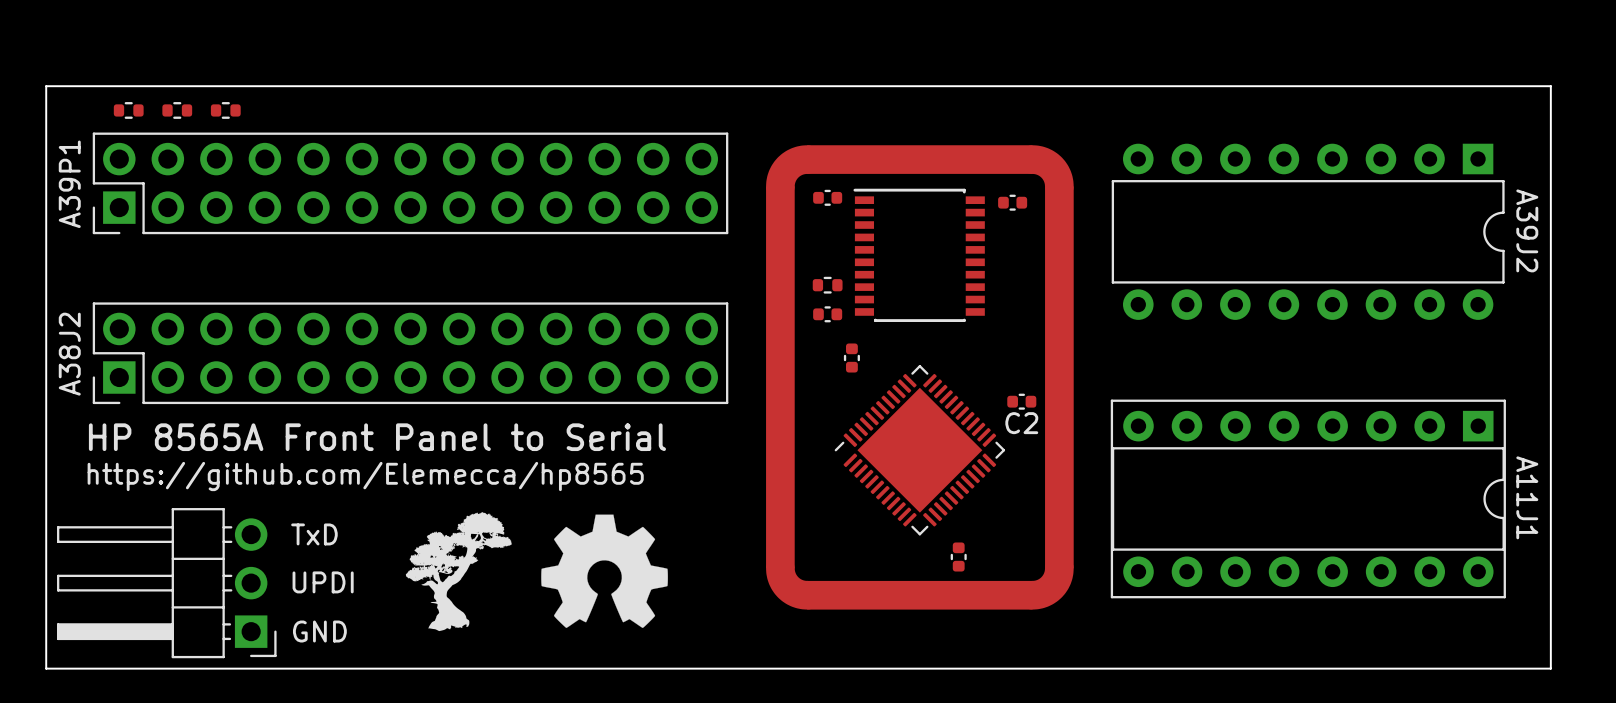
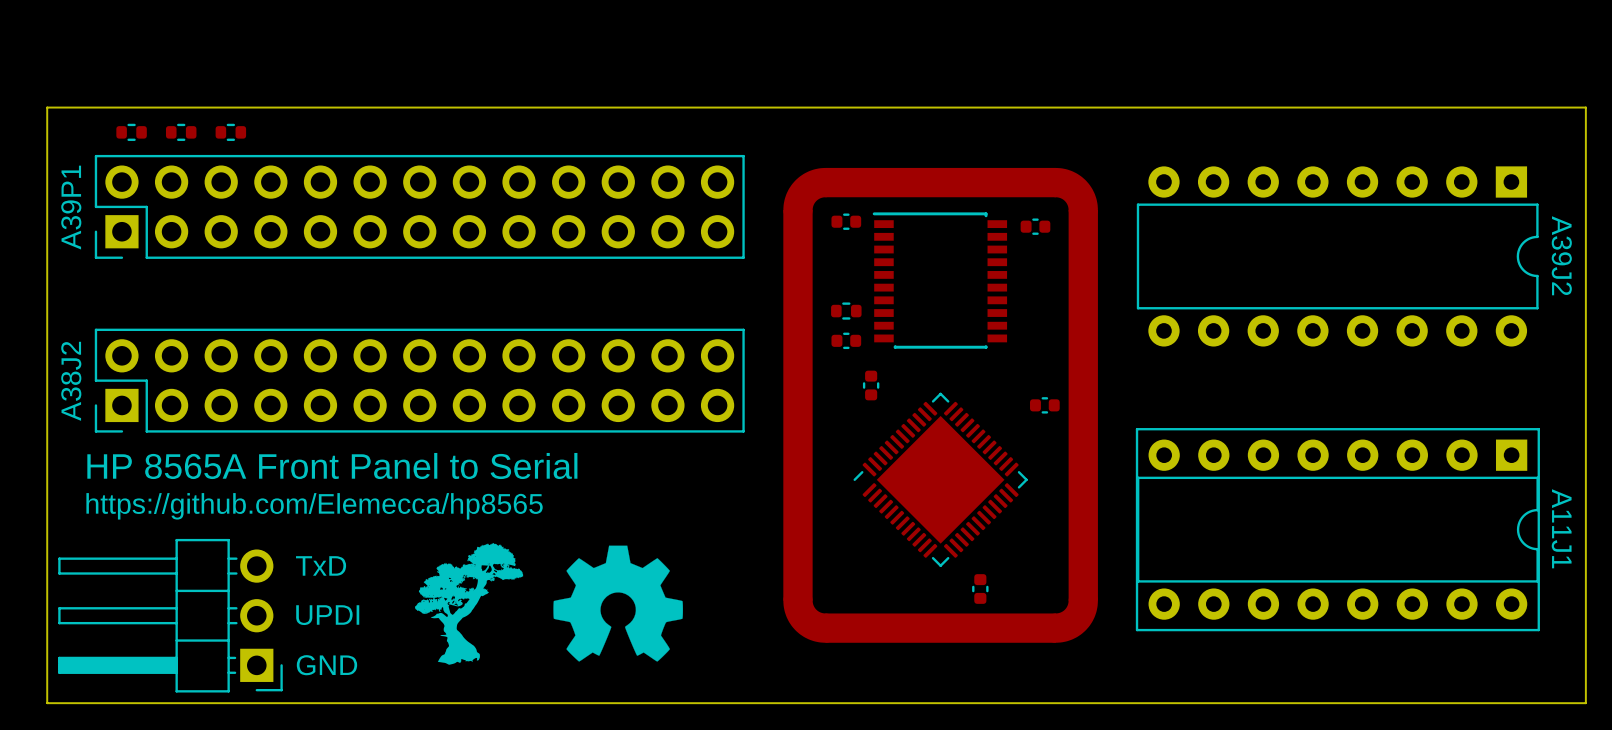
part: none -> (1044, 405)
C2: (1021, 401) -> none

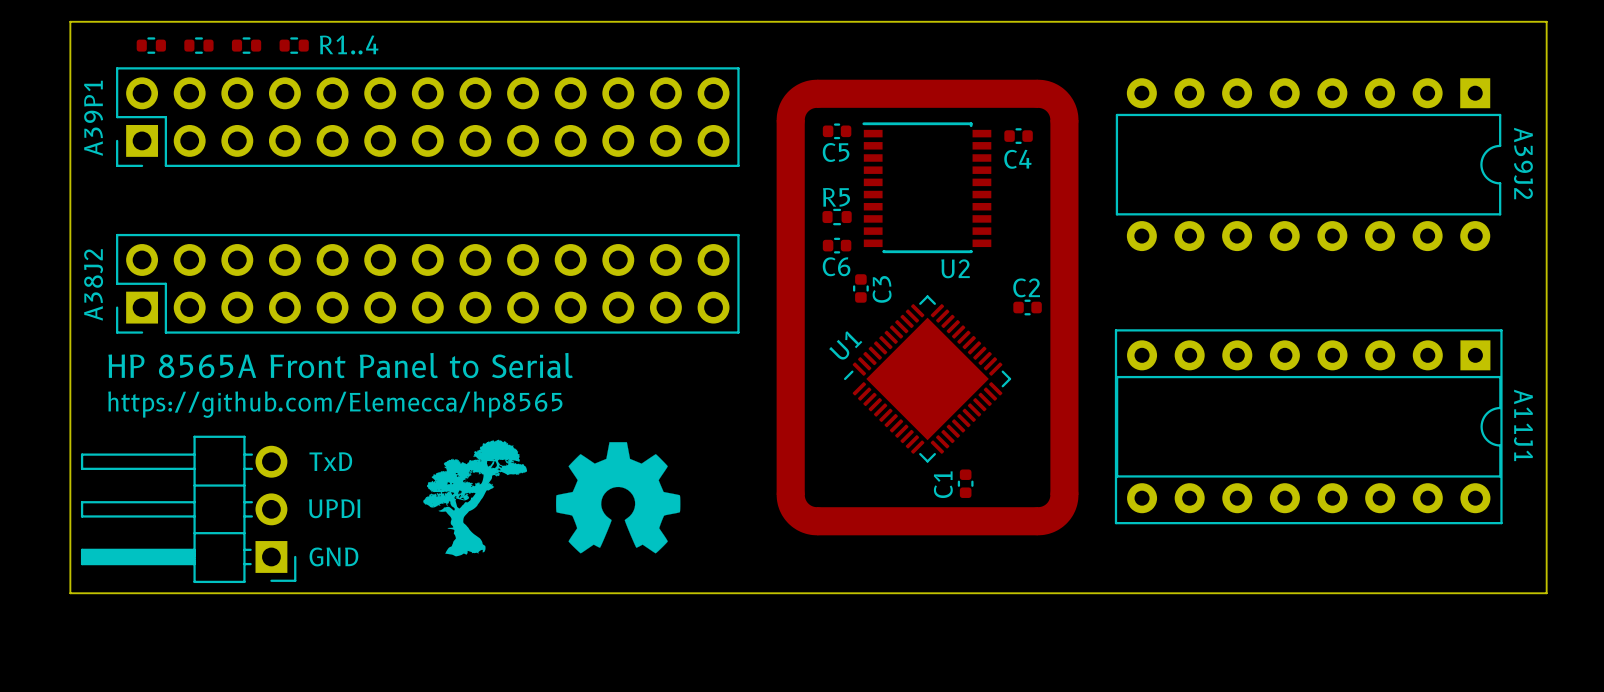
text: none -> R1..4 (349, 44)
part: none -> (294, 45)
C5 name: none -> C5 (836, 152)
C4 name: none -> C4 (1017, 159)
R5 name: none -> R5 (836, 197)
C6 name: none -> C6 (836, 266)
U2 name: none -> U2 (955, 268)
C2 name: none -> C2 (1026, 287)
C3 name: none -> C3 (882, 289)
U1 name: none -> U1 (845, 345)
C1 name: none -> C1 (943, 484)

